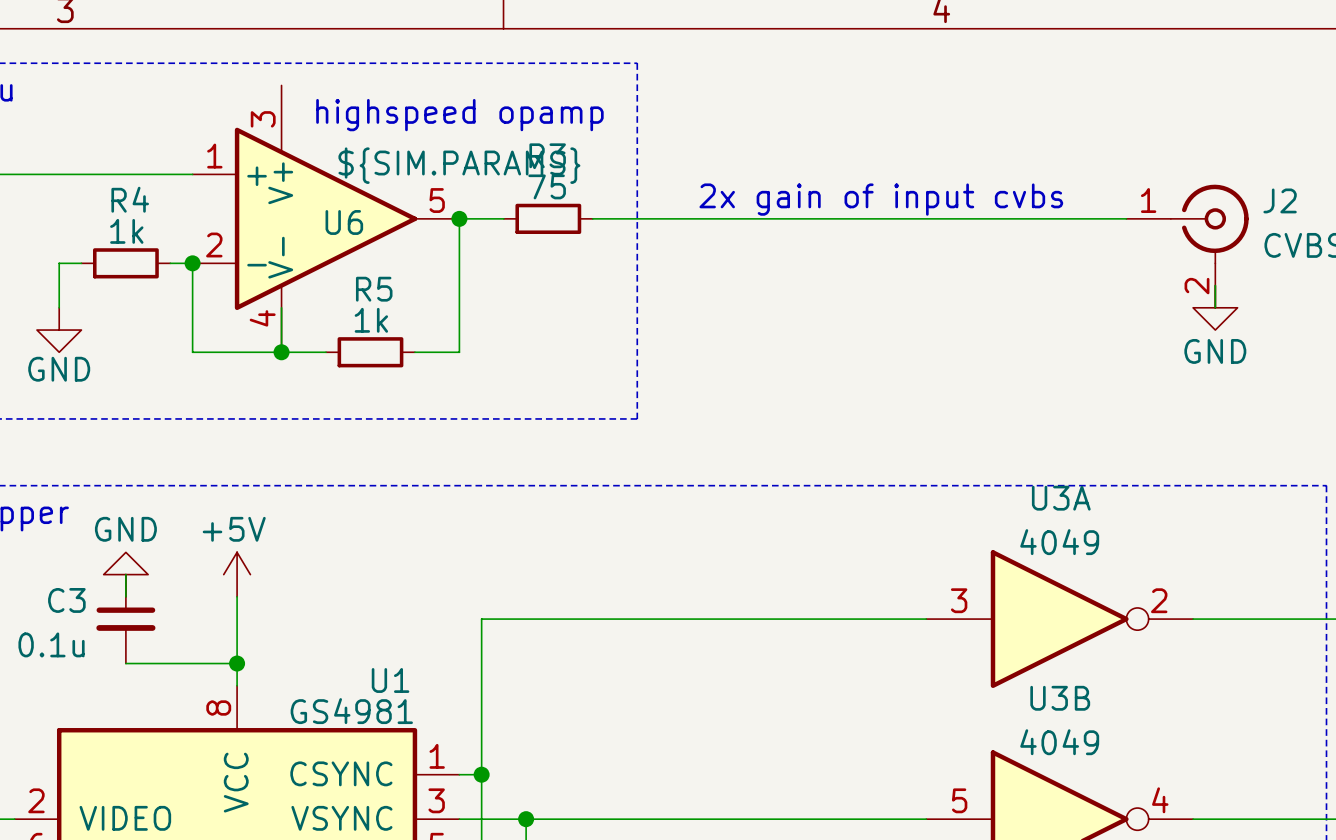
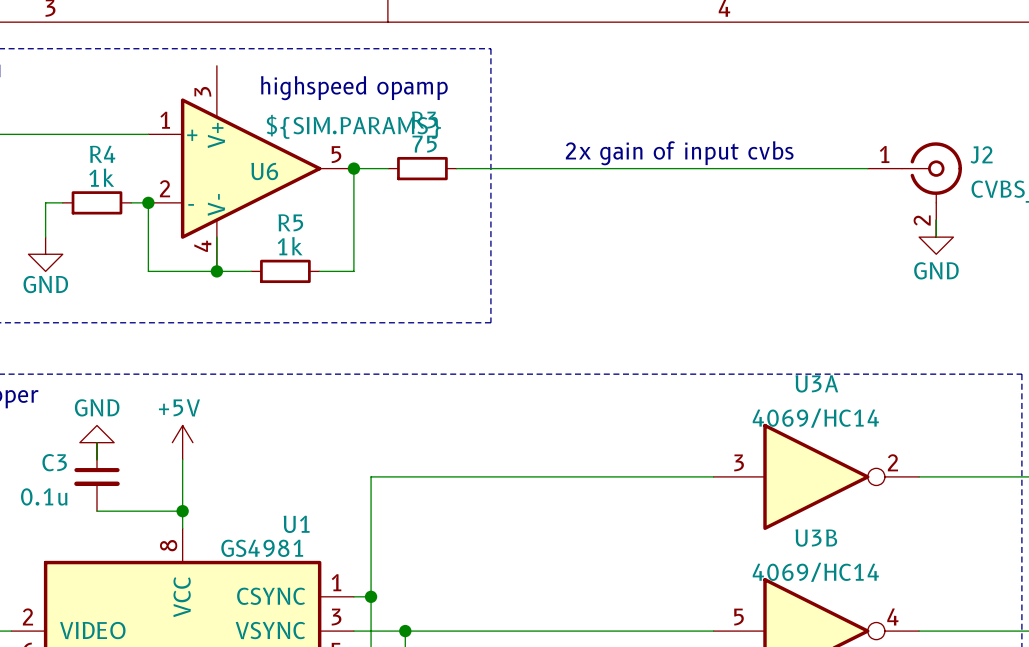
U3A value: 4049 (1059, 542) -> 4069/HC14 (815, 418)
U3B value: 4049 (1059, 742) -> 4069/HC14 (815, 572)

